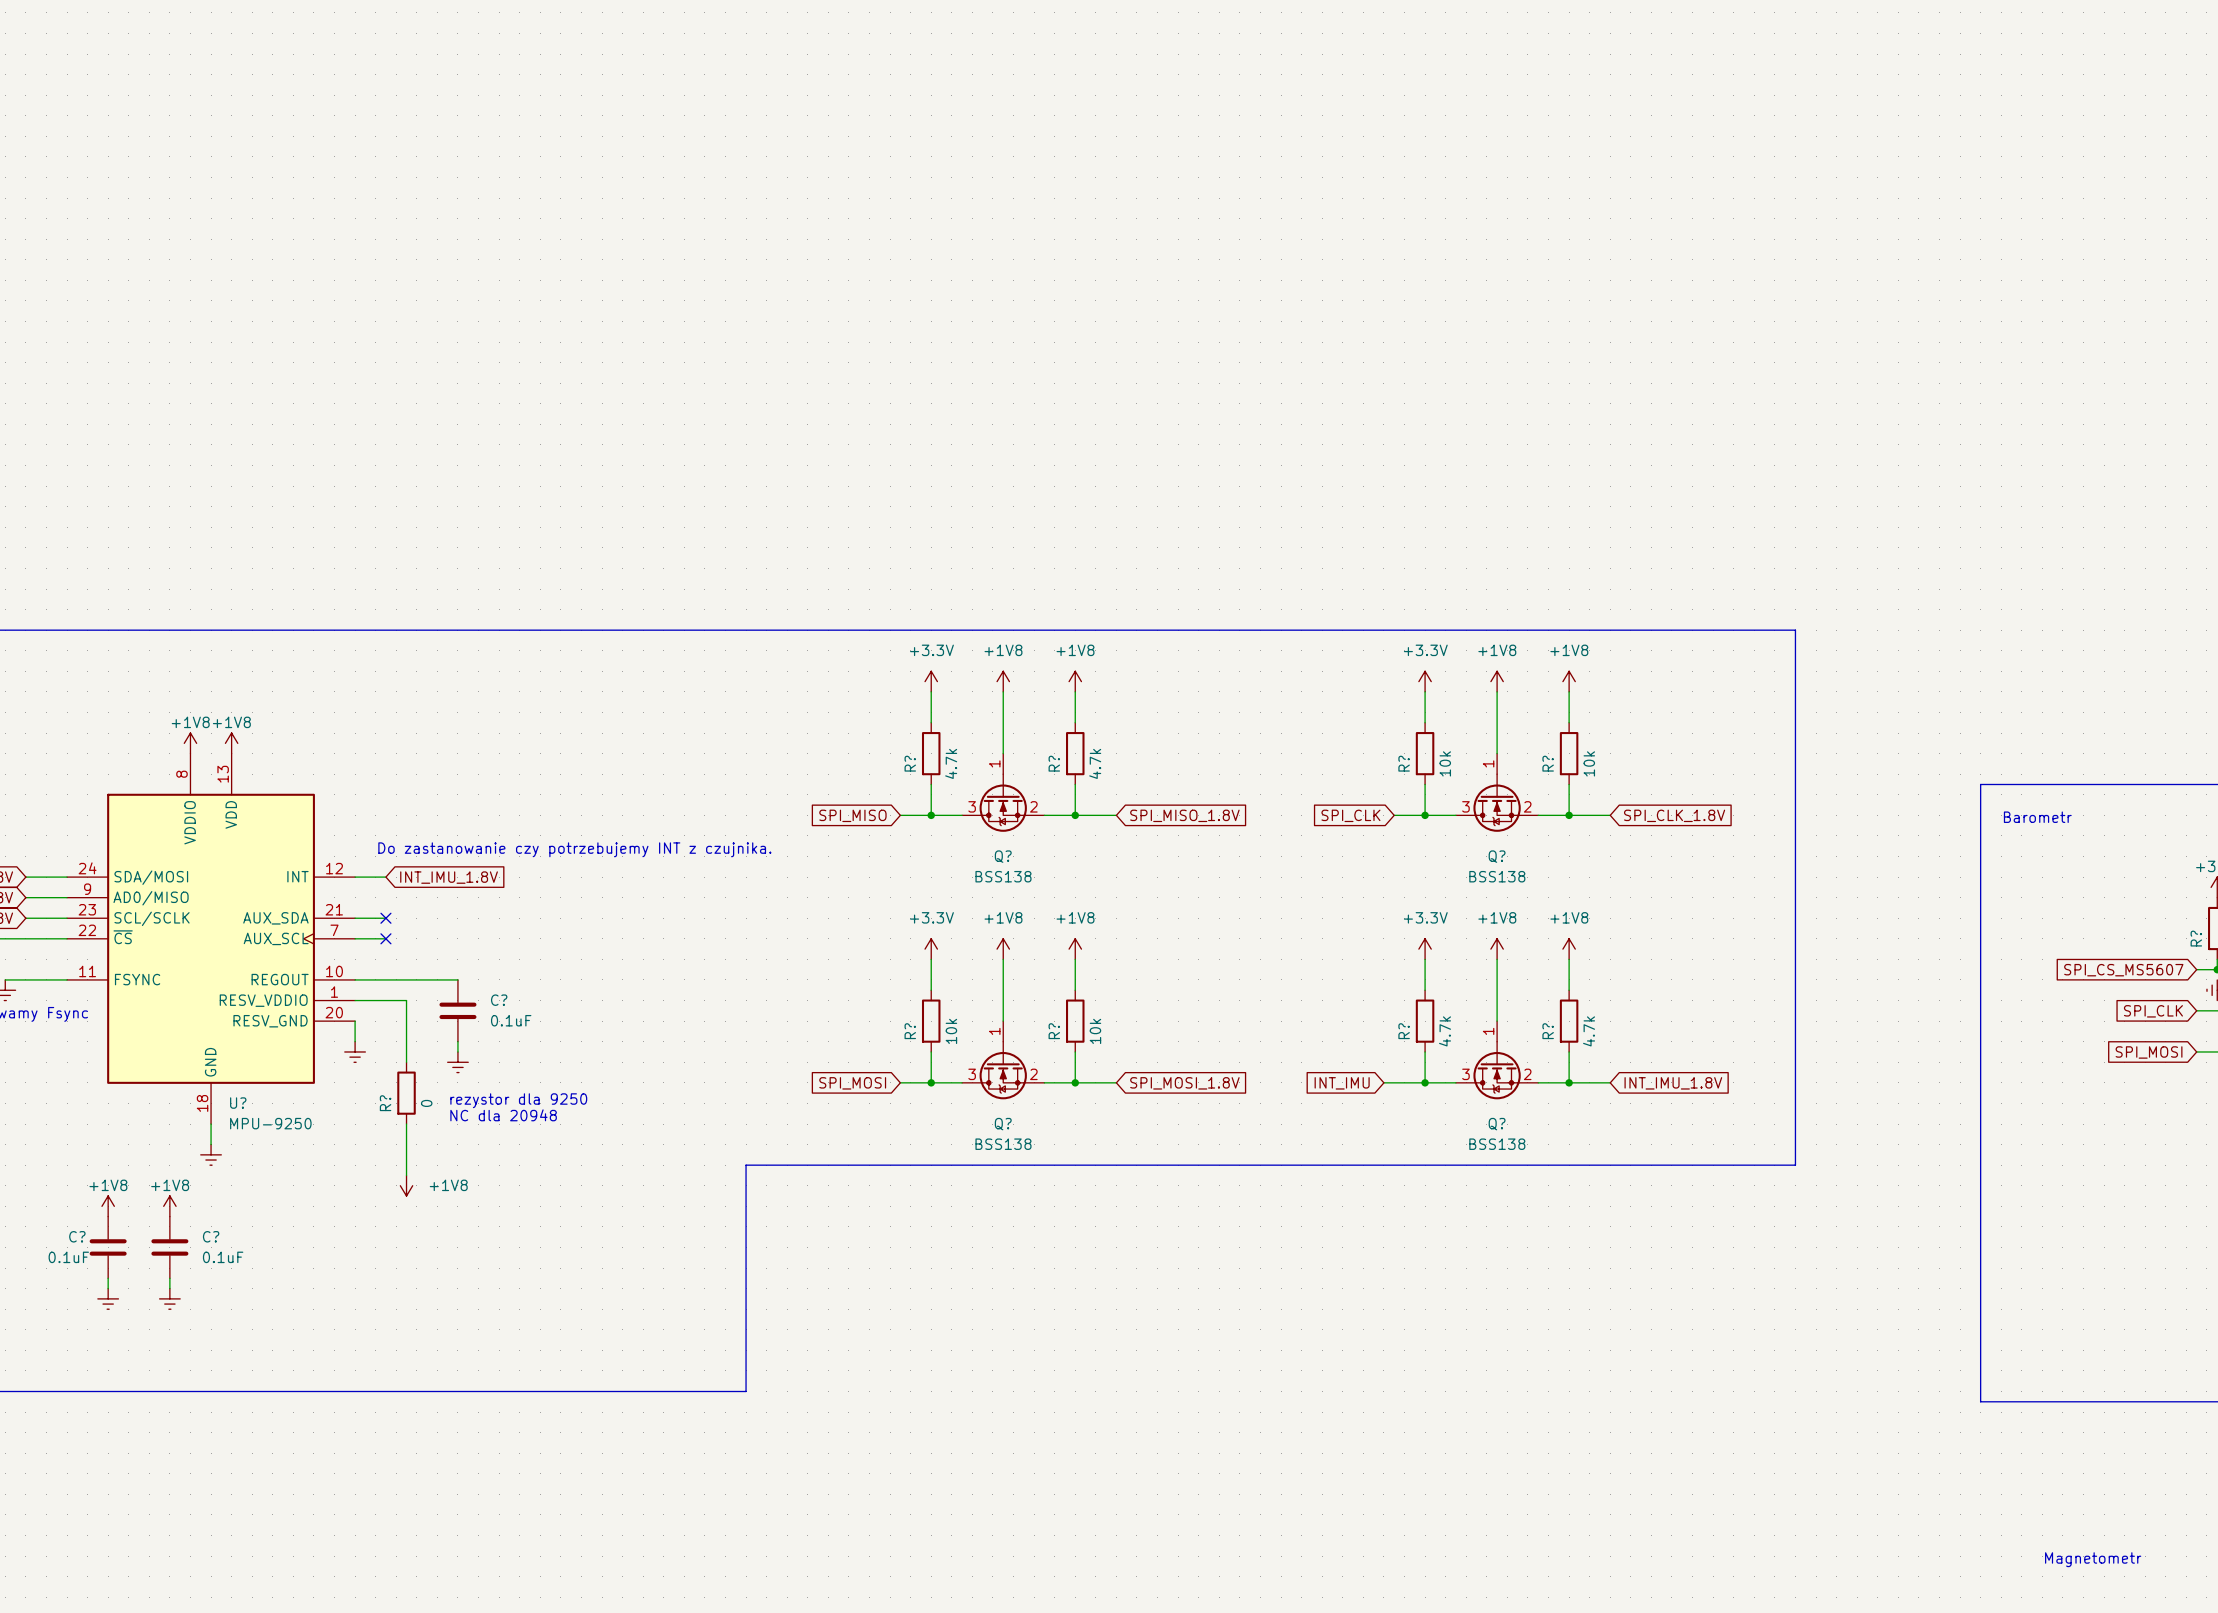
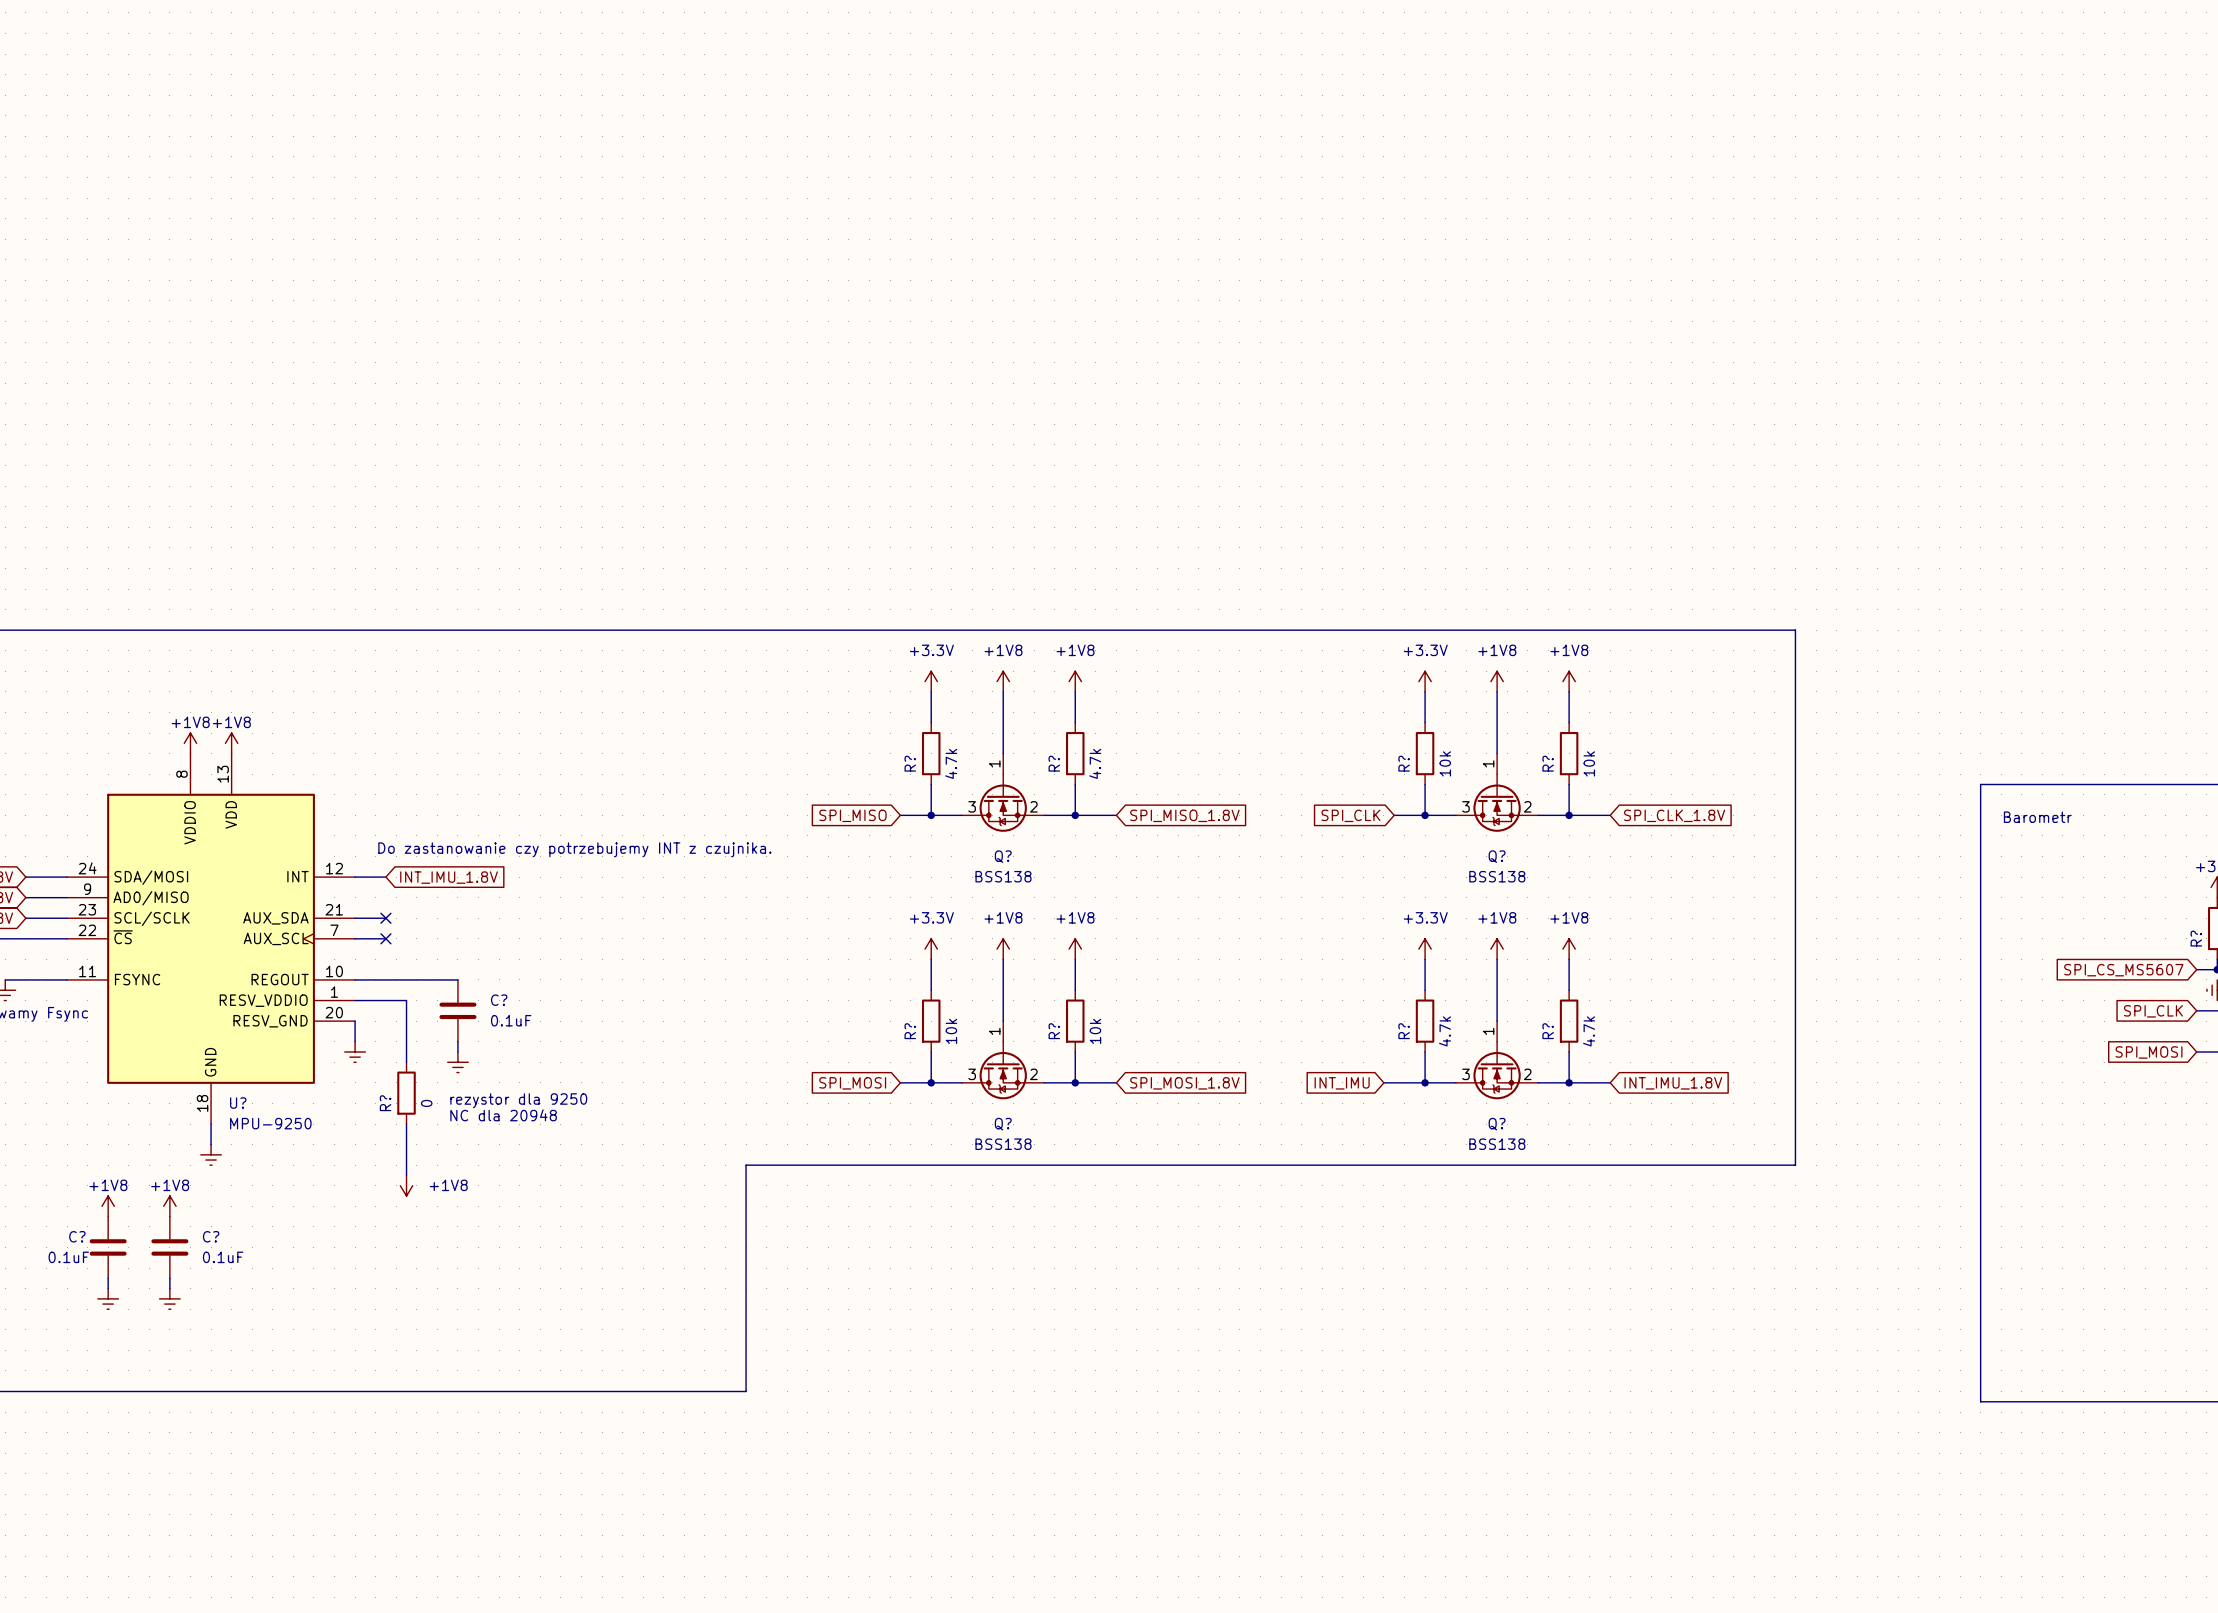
text: Magnetometr (2093, 1559) -> none

